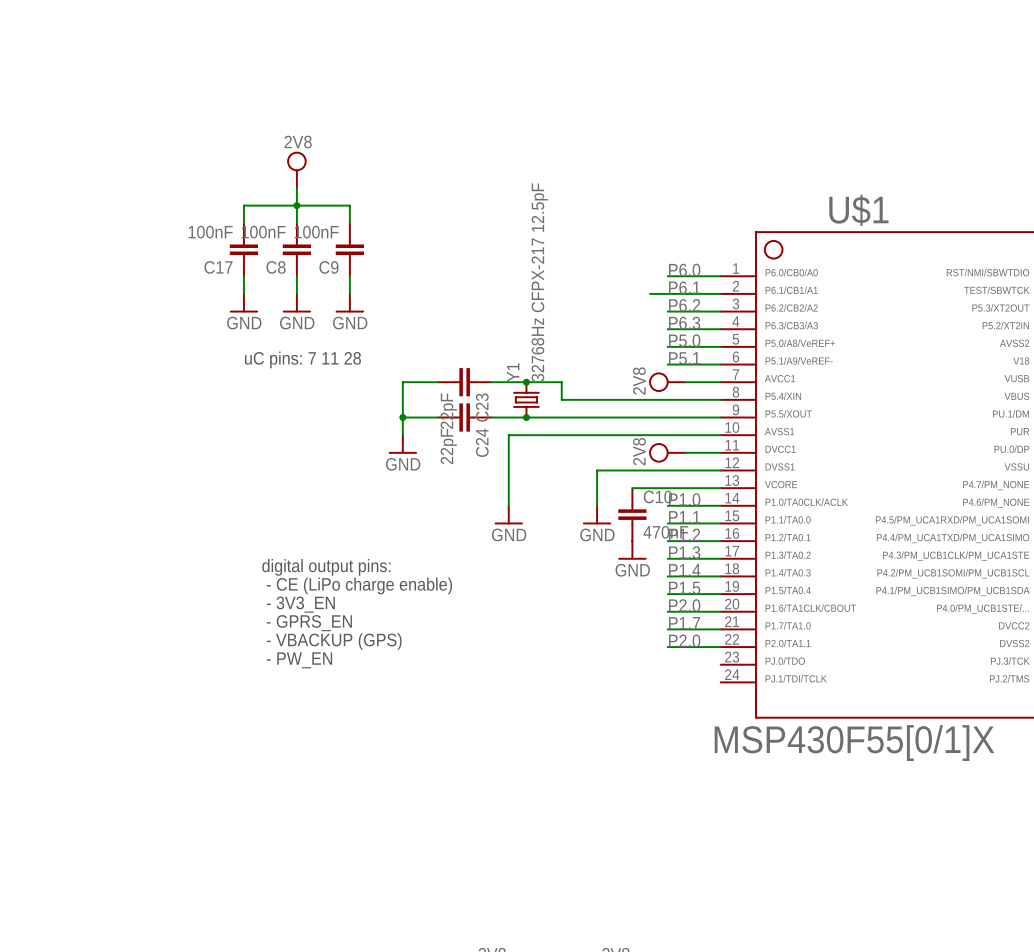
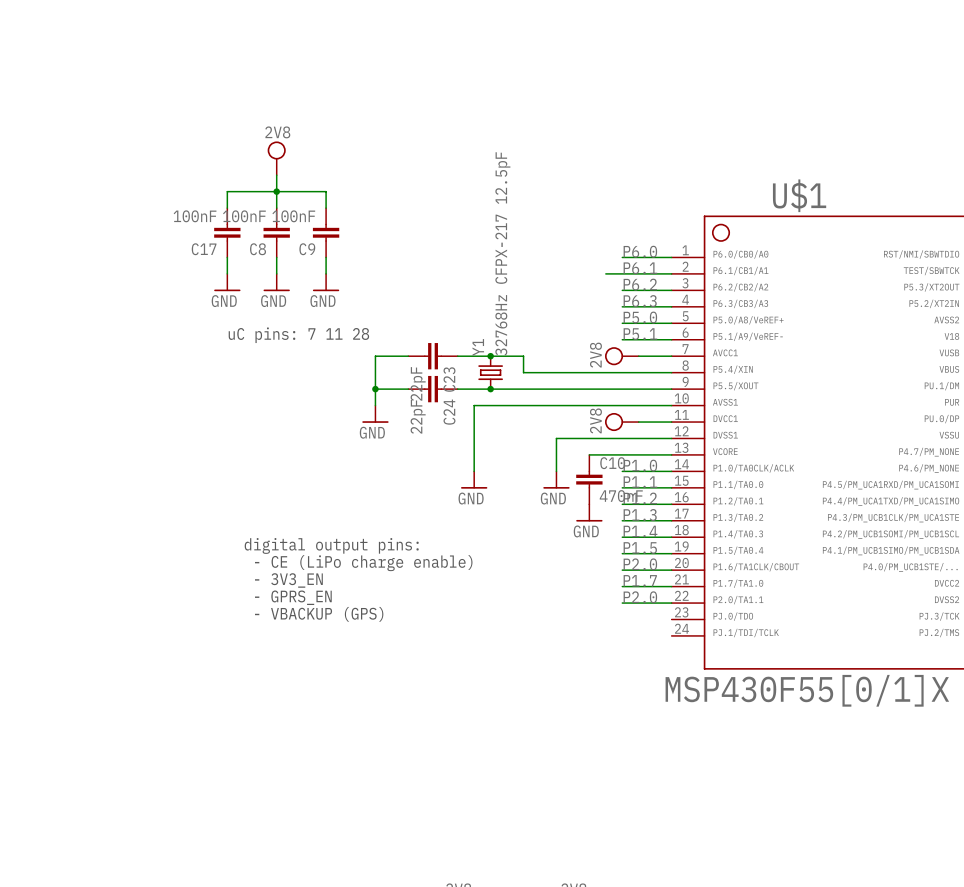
text: digital output pins: (326, 567) -> none
text: - CE (LiPo charge enable) (359, 585) -> digital output pins: (331, 545)
text: - 3V3_EN (300, 604) -> - CE (LiPo charge enable) (363, 563)
text: - GPRS_EN (309, 623) -> - 3V3_EN (288, 580)
text: - VBACKUP (GPS) (334, 641) -> - GPRS_EN (293, 597)
text: - PW_EN (299, 660) -> - VBACKUP (GPS) (319, 614)

